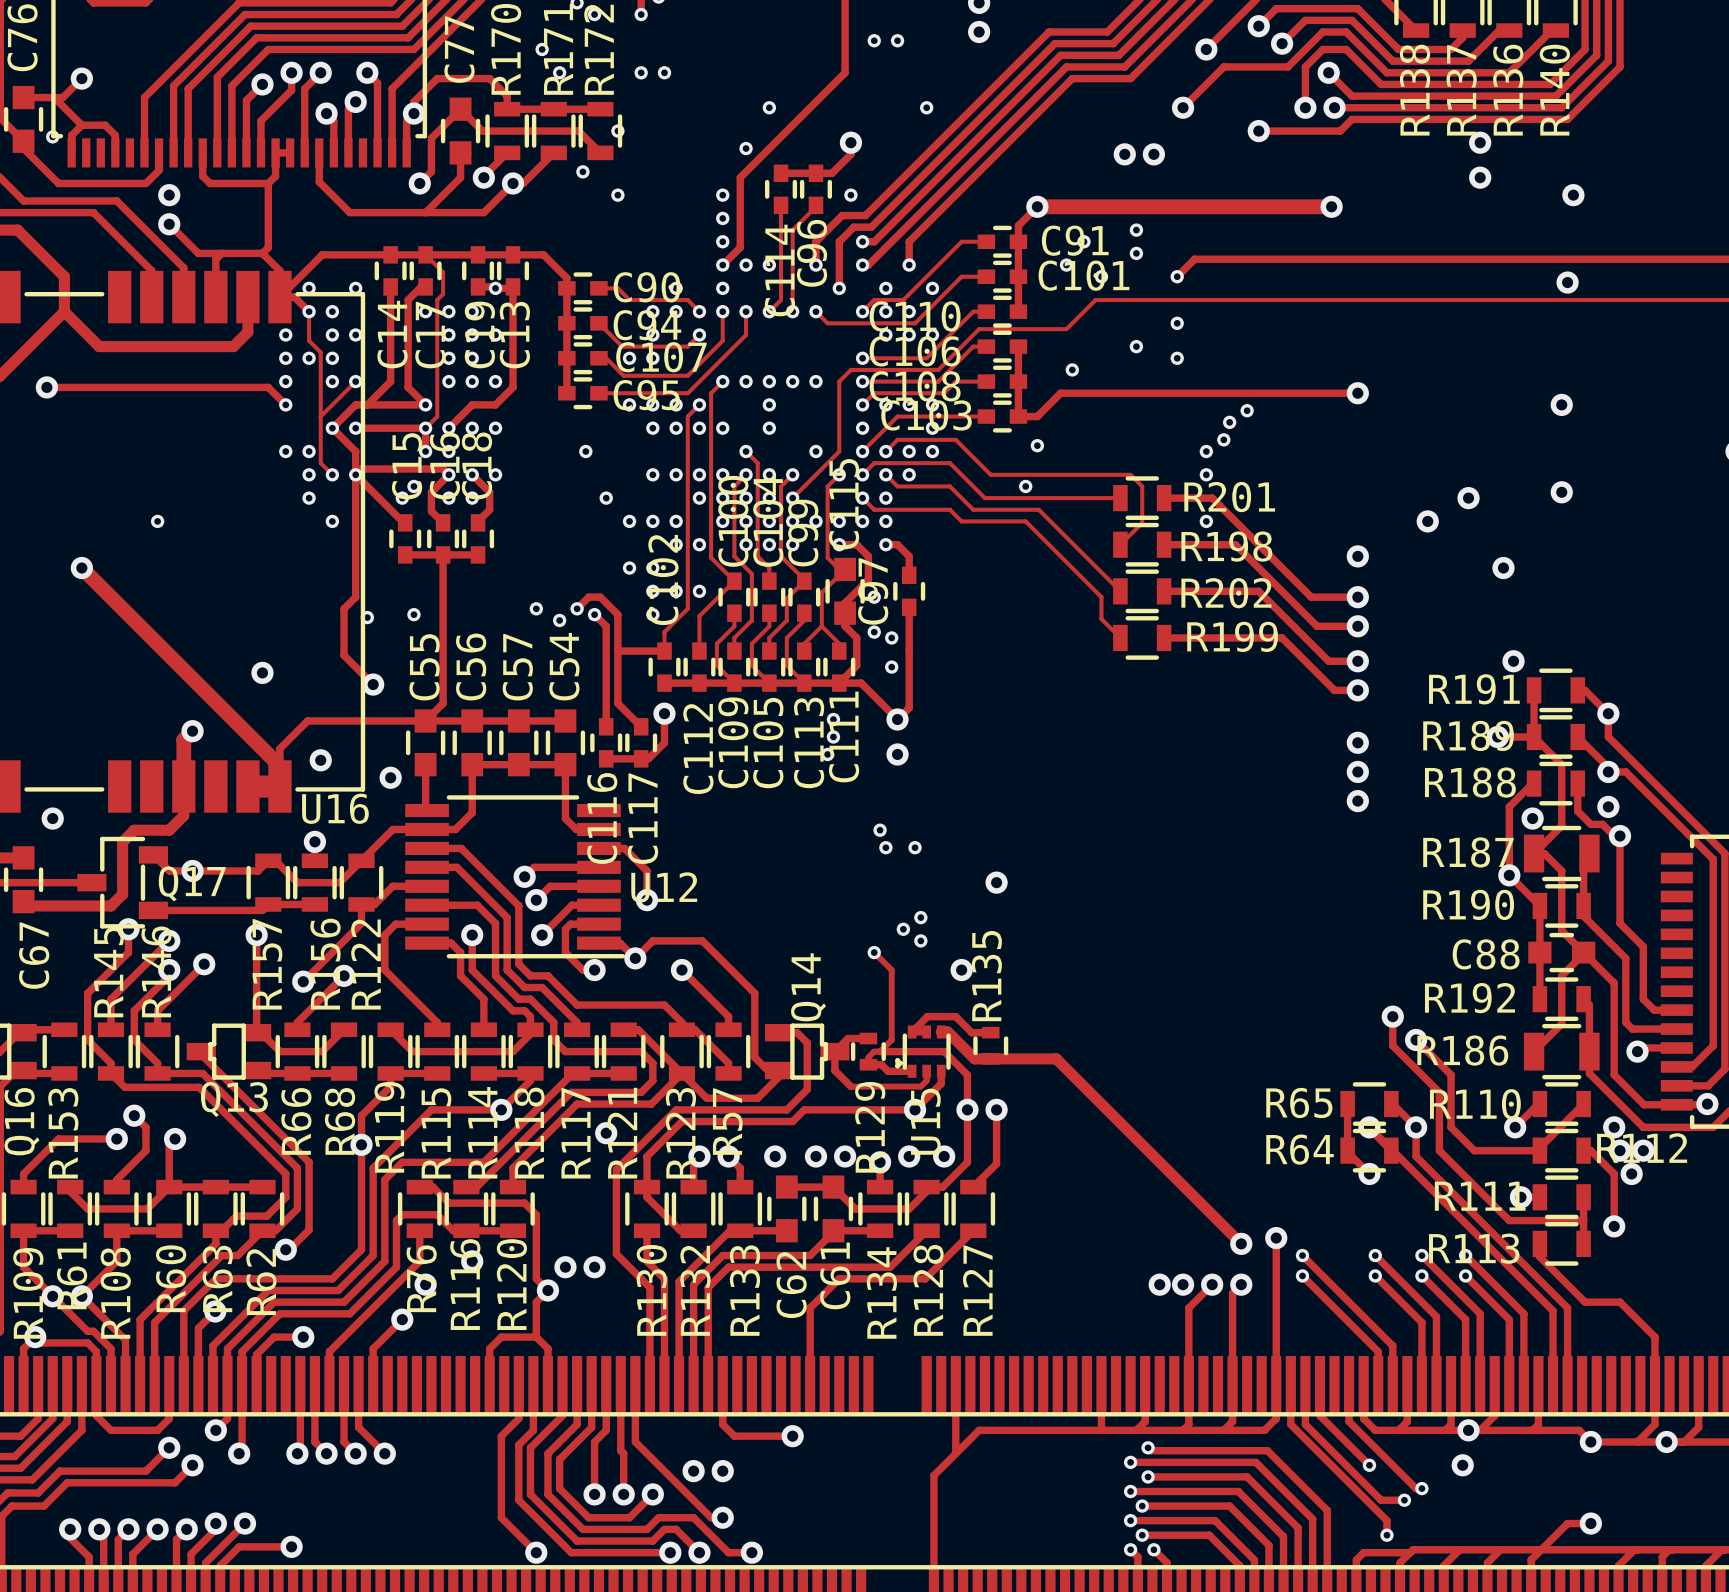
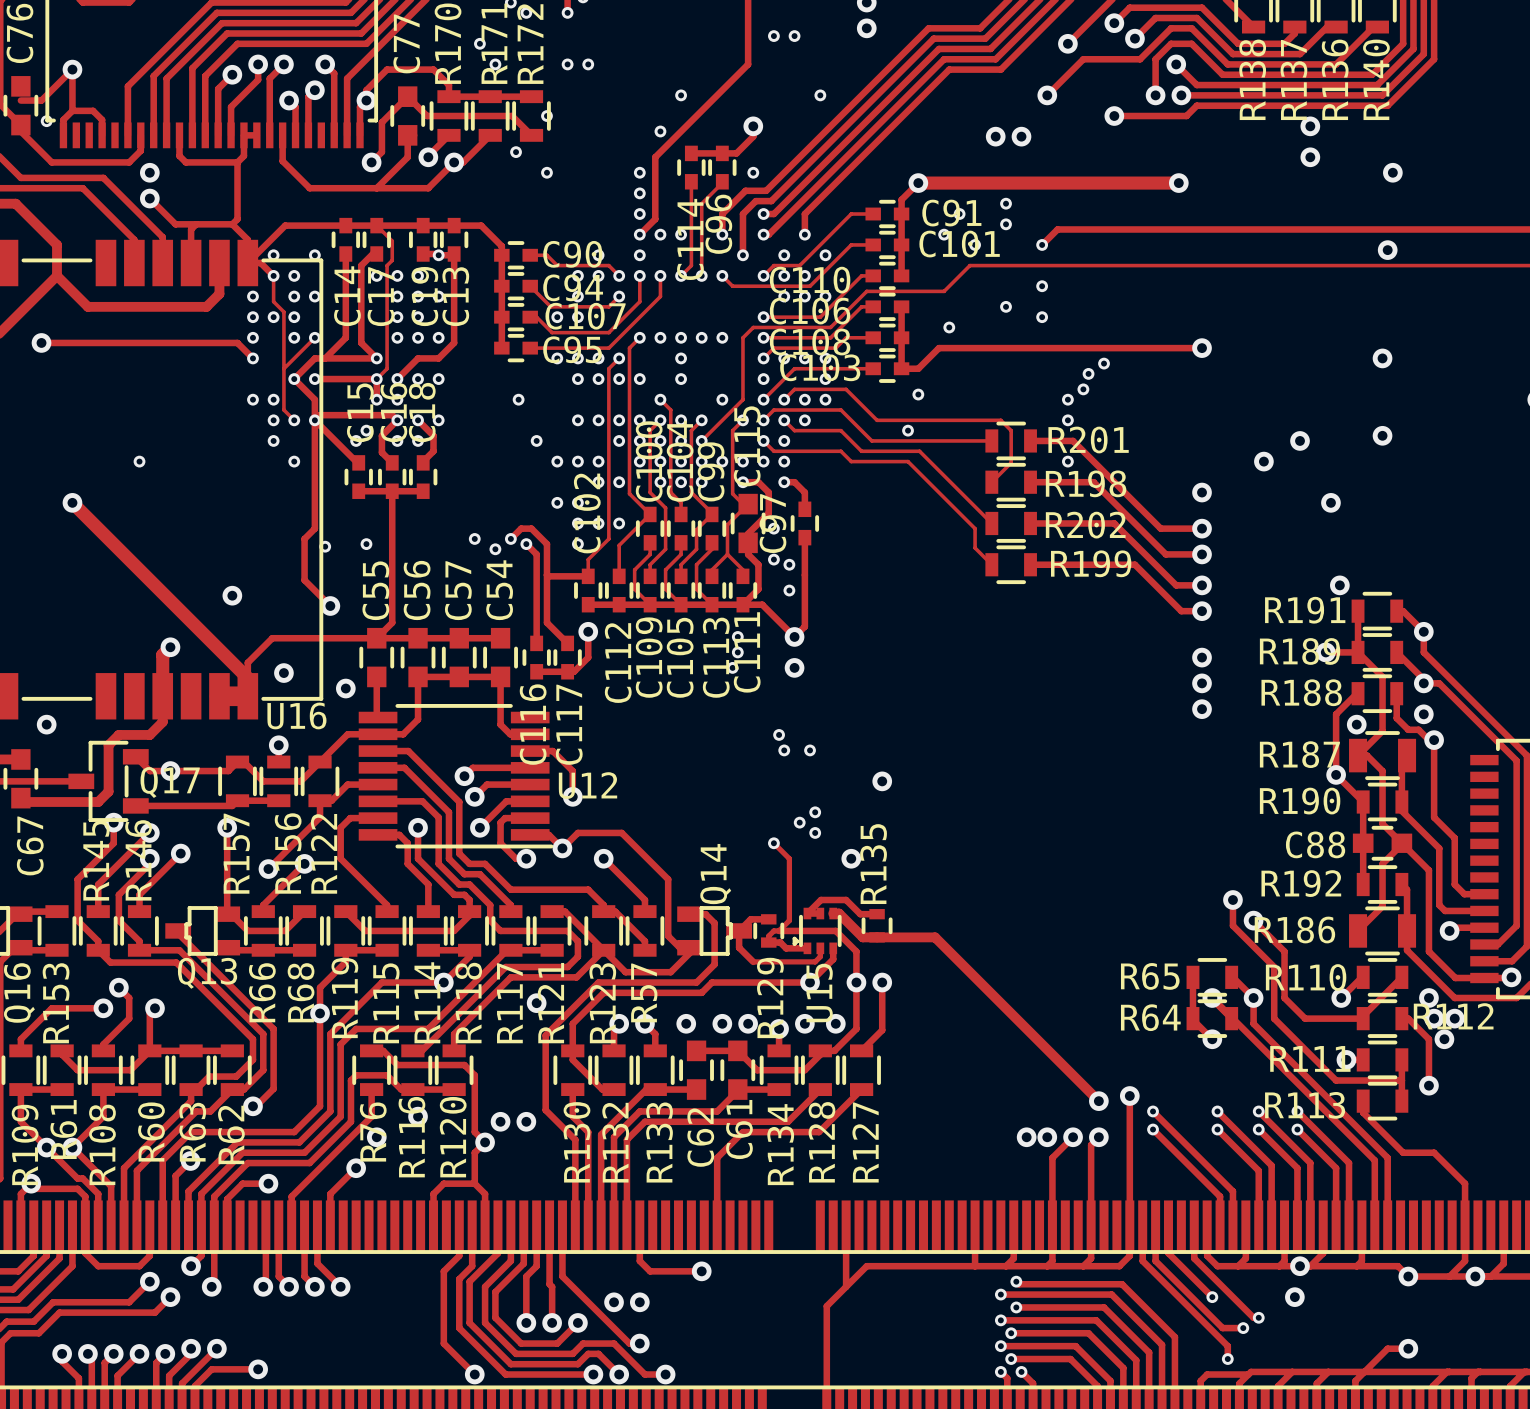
track: (23, 97) (62, 97) -> (20, 100) (41, 100) (55, 86)
track: (54, 97) (81, 125) -> (72, 69) (72, 110)

